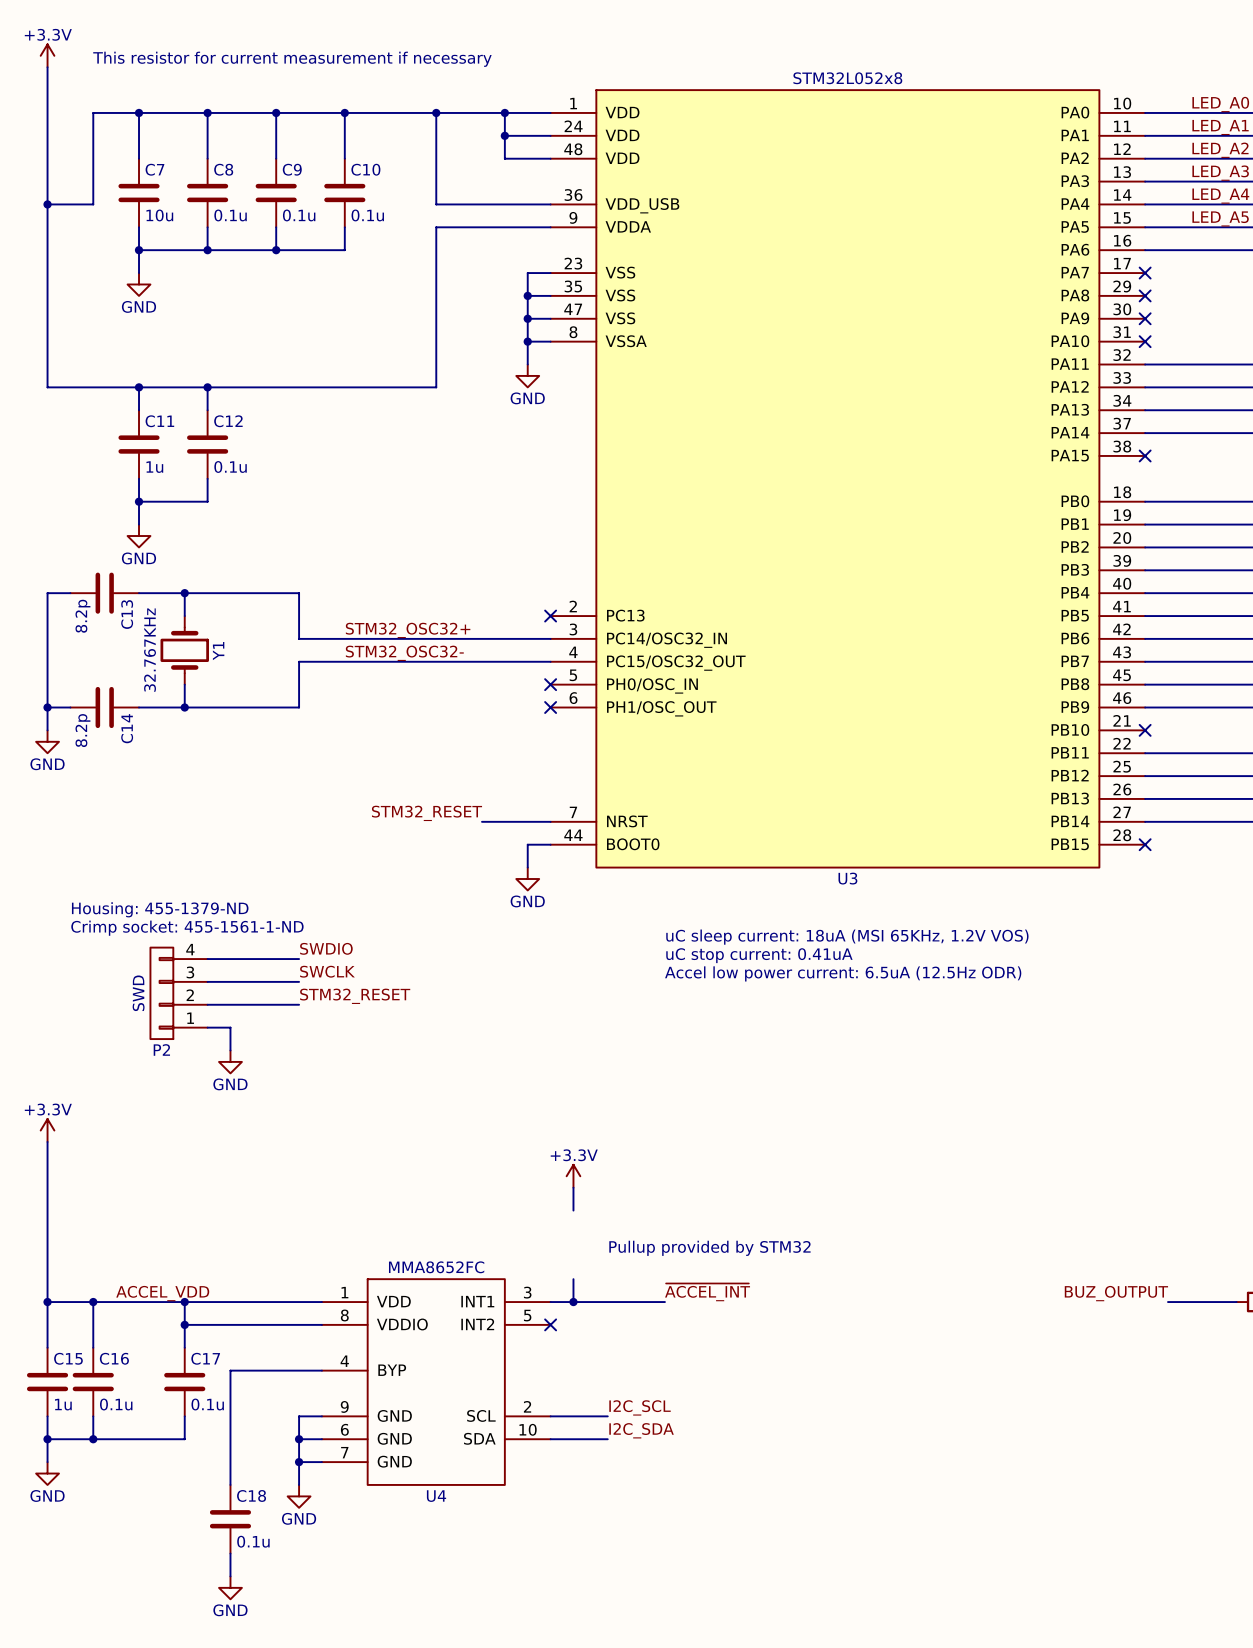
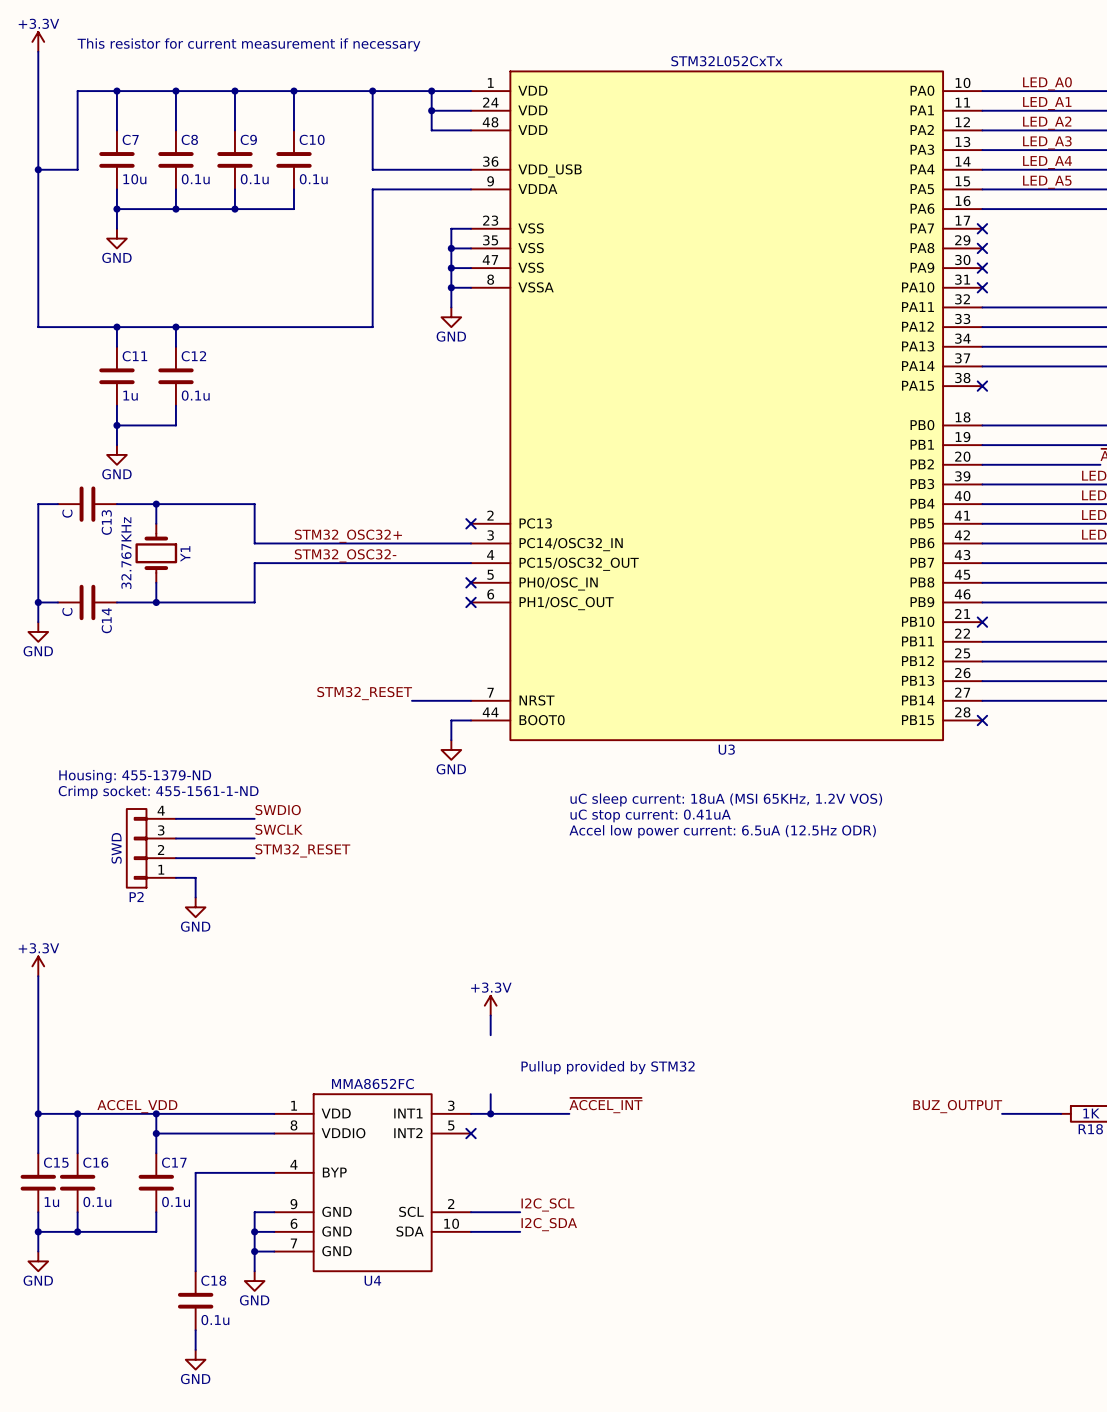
U3 value: STM32L052x8 (847, 78) -> STM32L052CxTx (726, 61)
C13 value: 8.2p (82, 616) -> C (67, 513)
C14 value: 8.2p (82, 730) -> C (67, 612)

